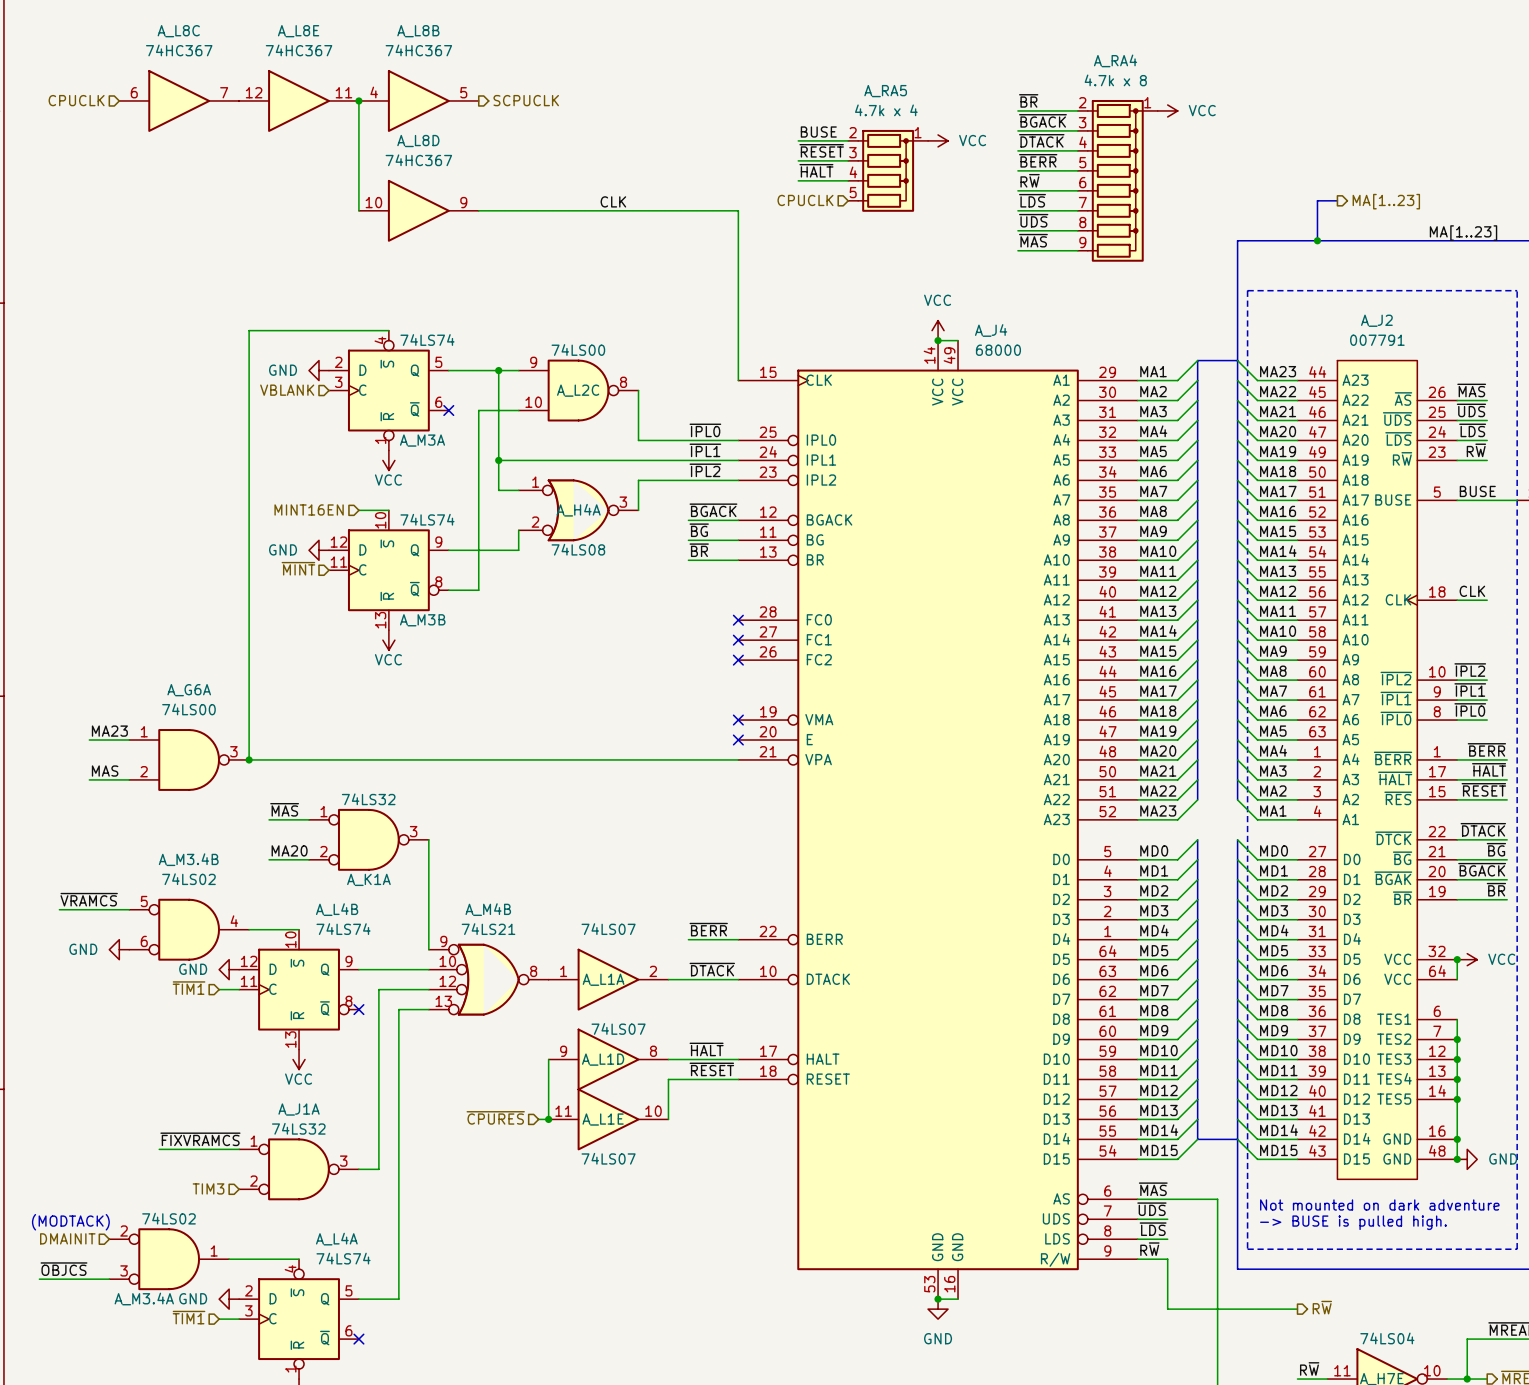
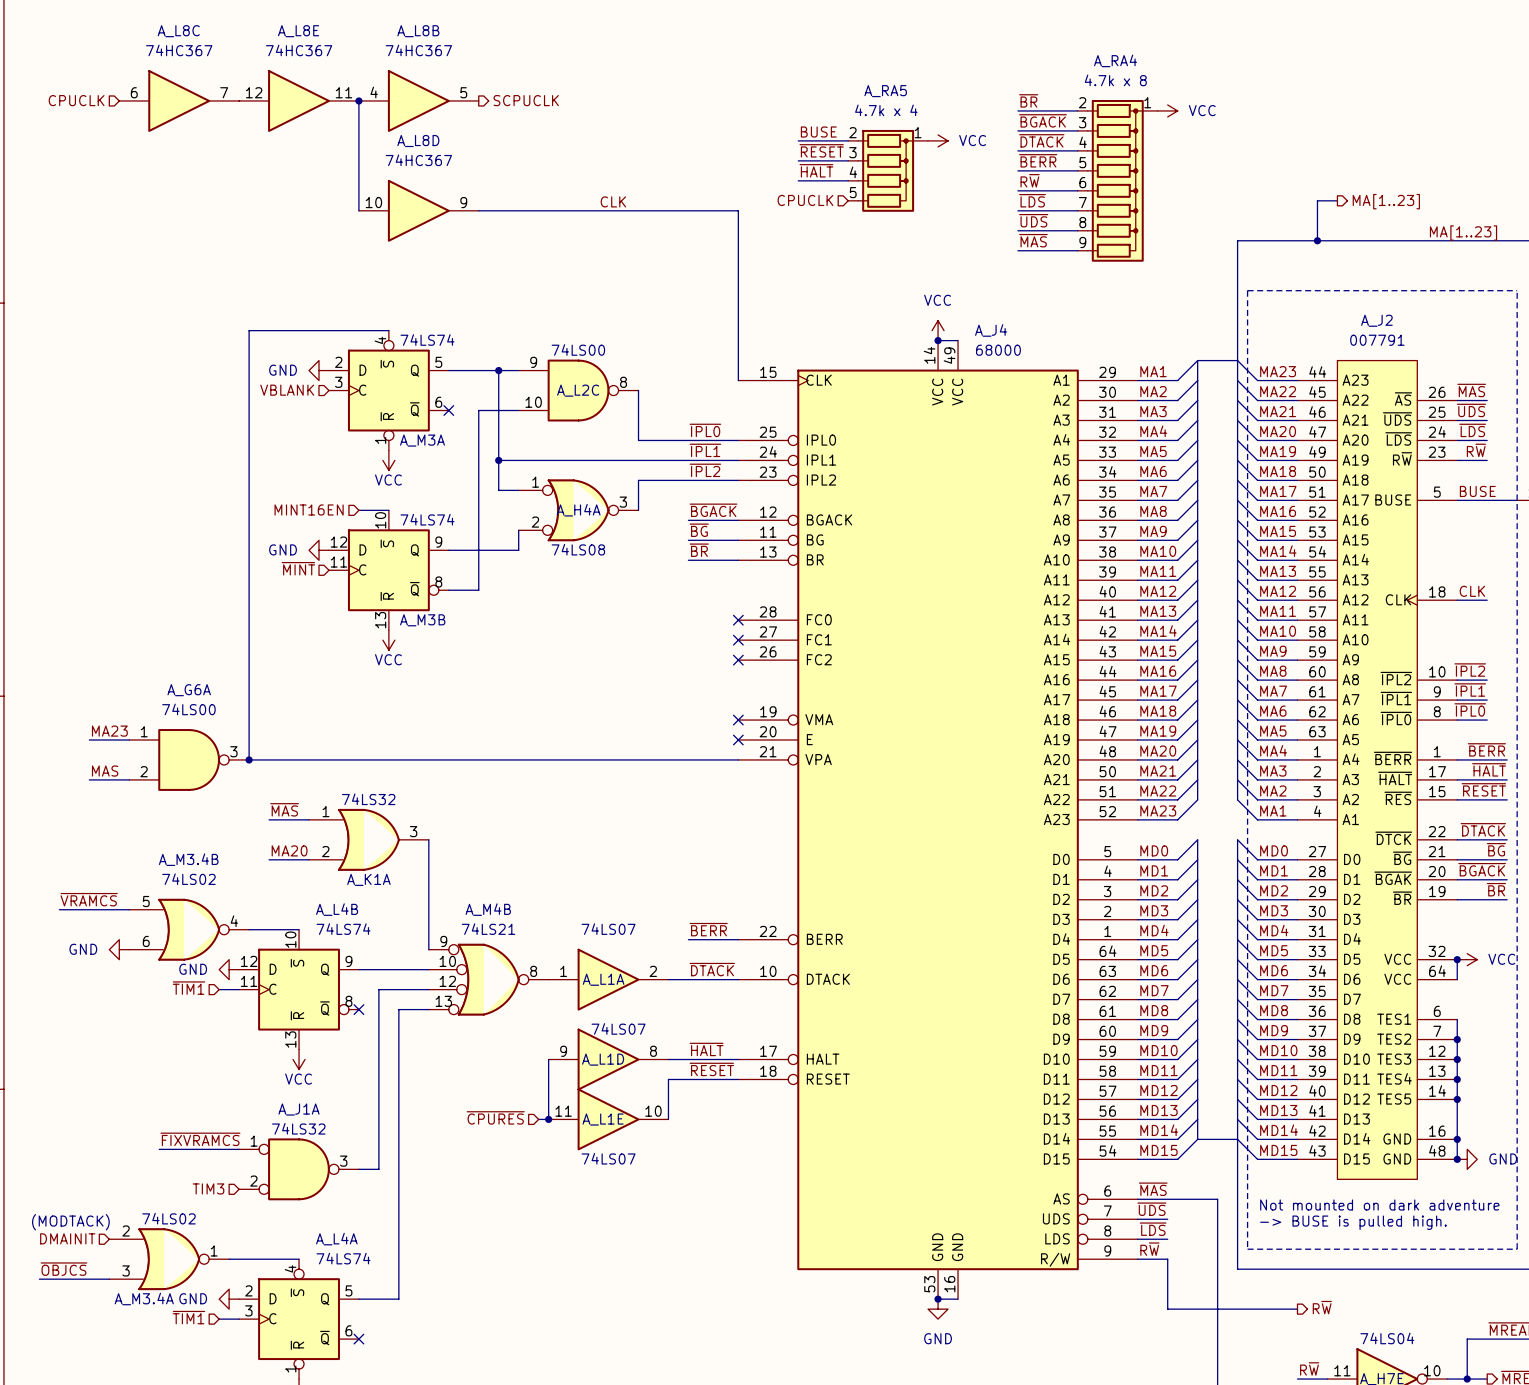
A_K1A symbol: [309, 808, 429, 871] -> [309, 808, 429, 871]
A_M3.4B symbol: [129, 898, 250, 961] -> [129, 898, 250, 961]
A_M3.4A symbol: [109, 1228, 230, 1291] -> [109, 1228, 230, 1291]

